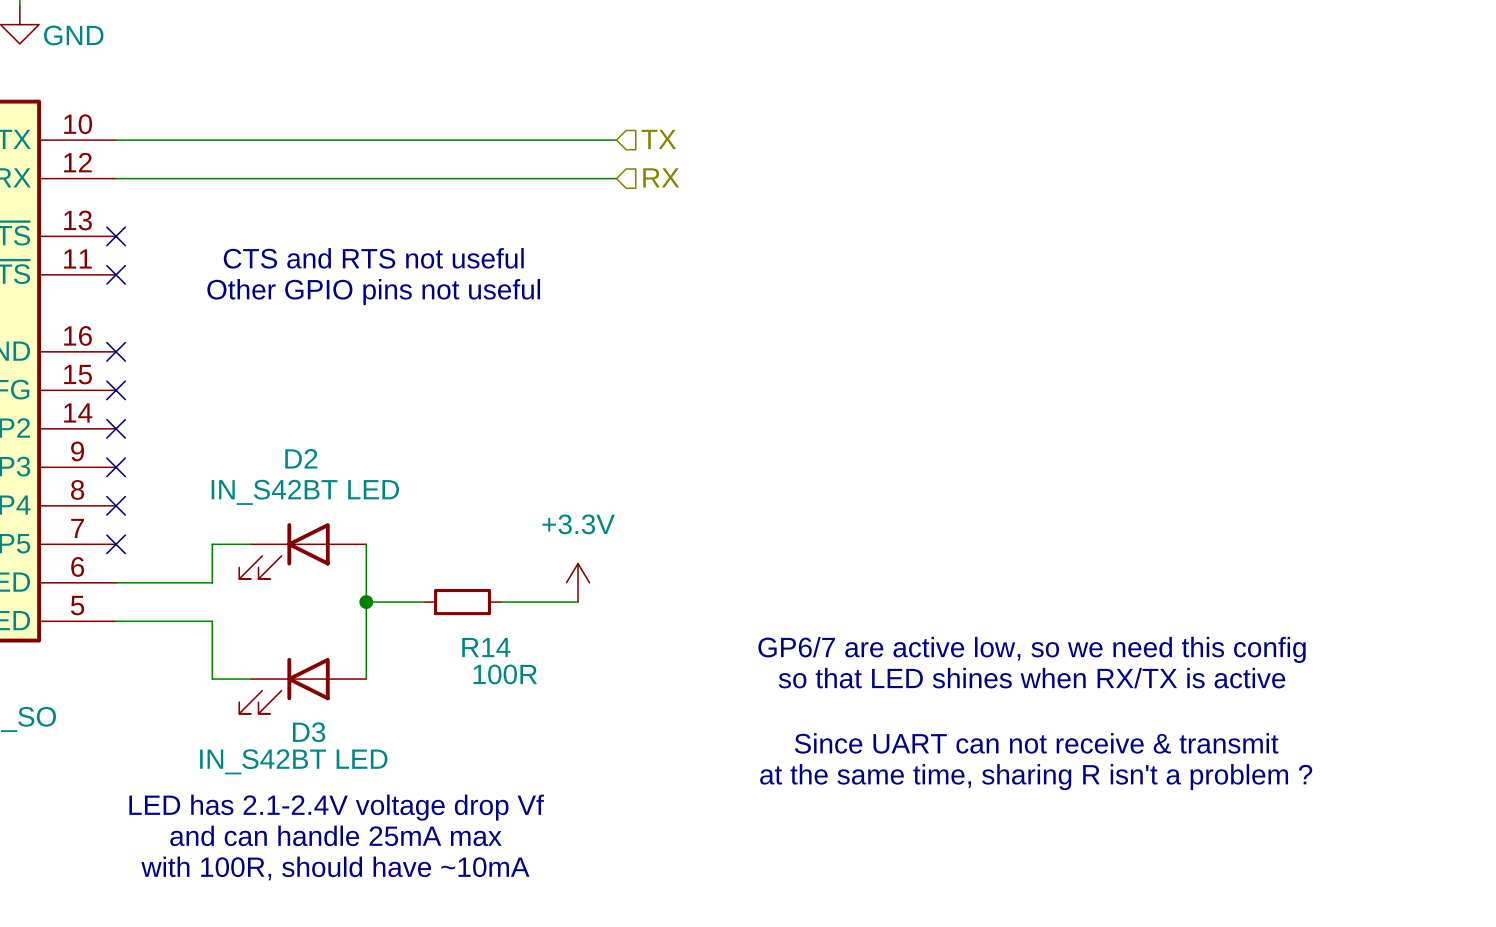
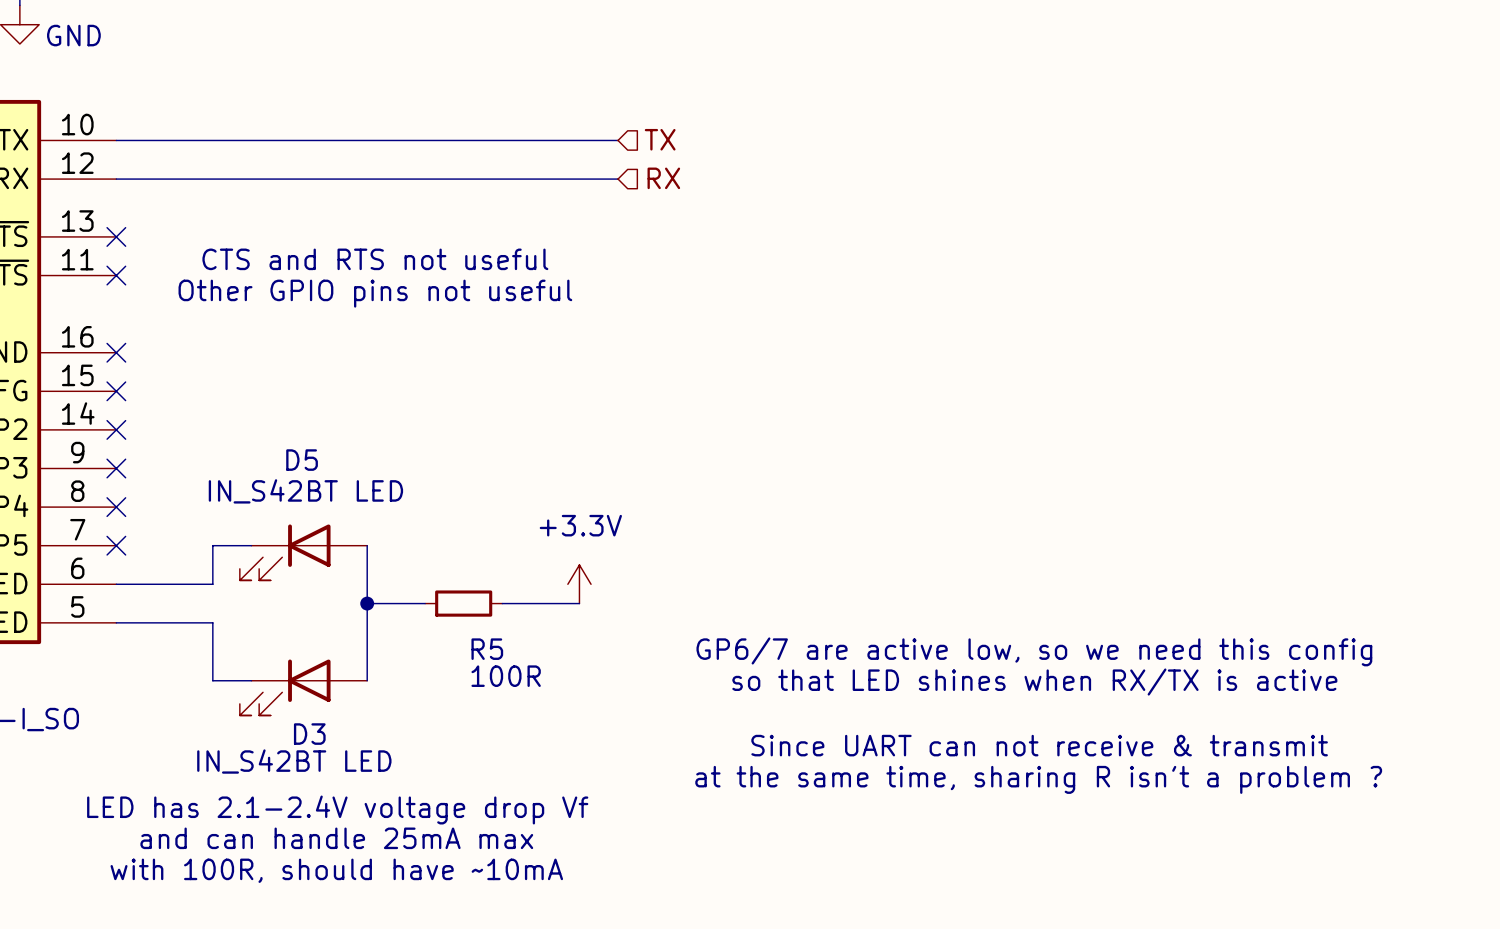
D2 name: D2 (301, 458) -> D5 (302, 460)
R14 name: R14 (486, 647) -> R5 (487, 649)

